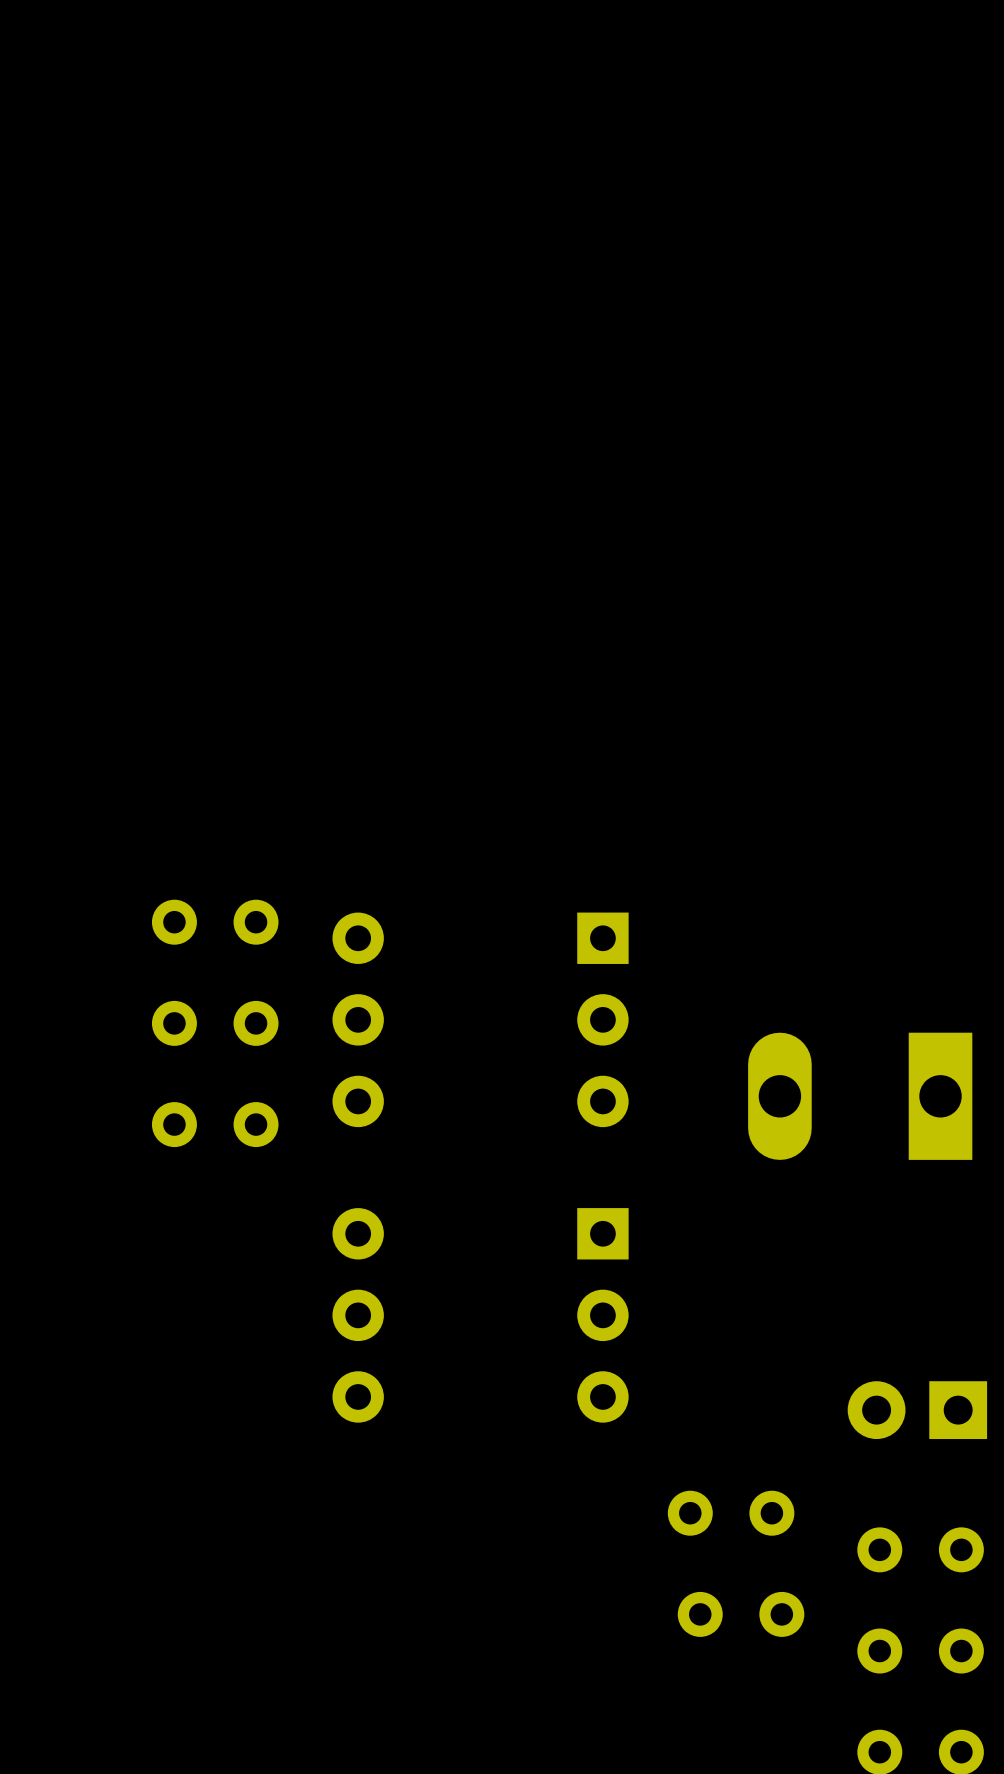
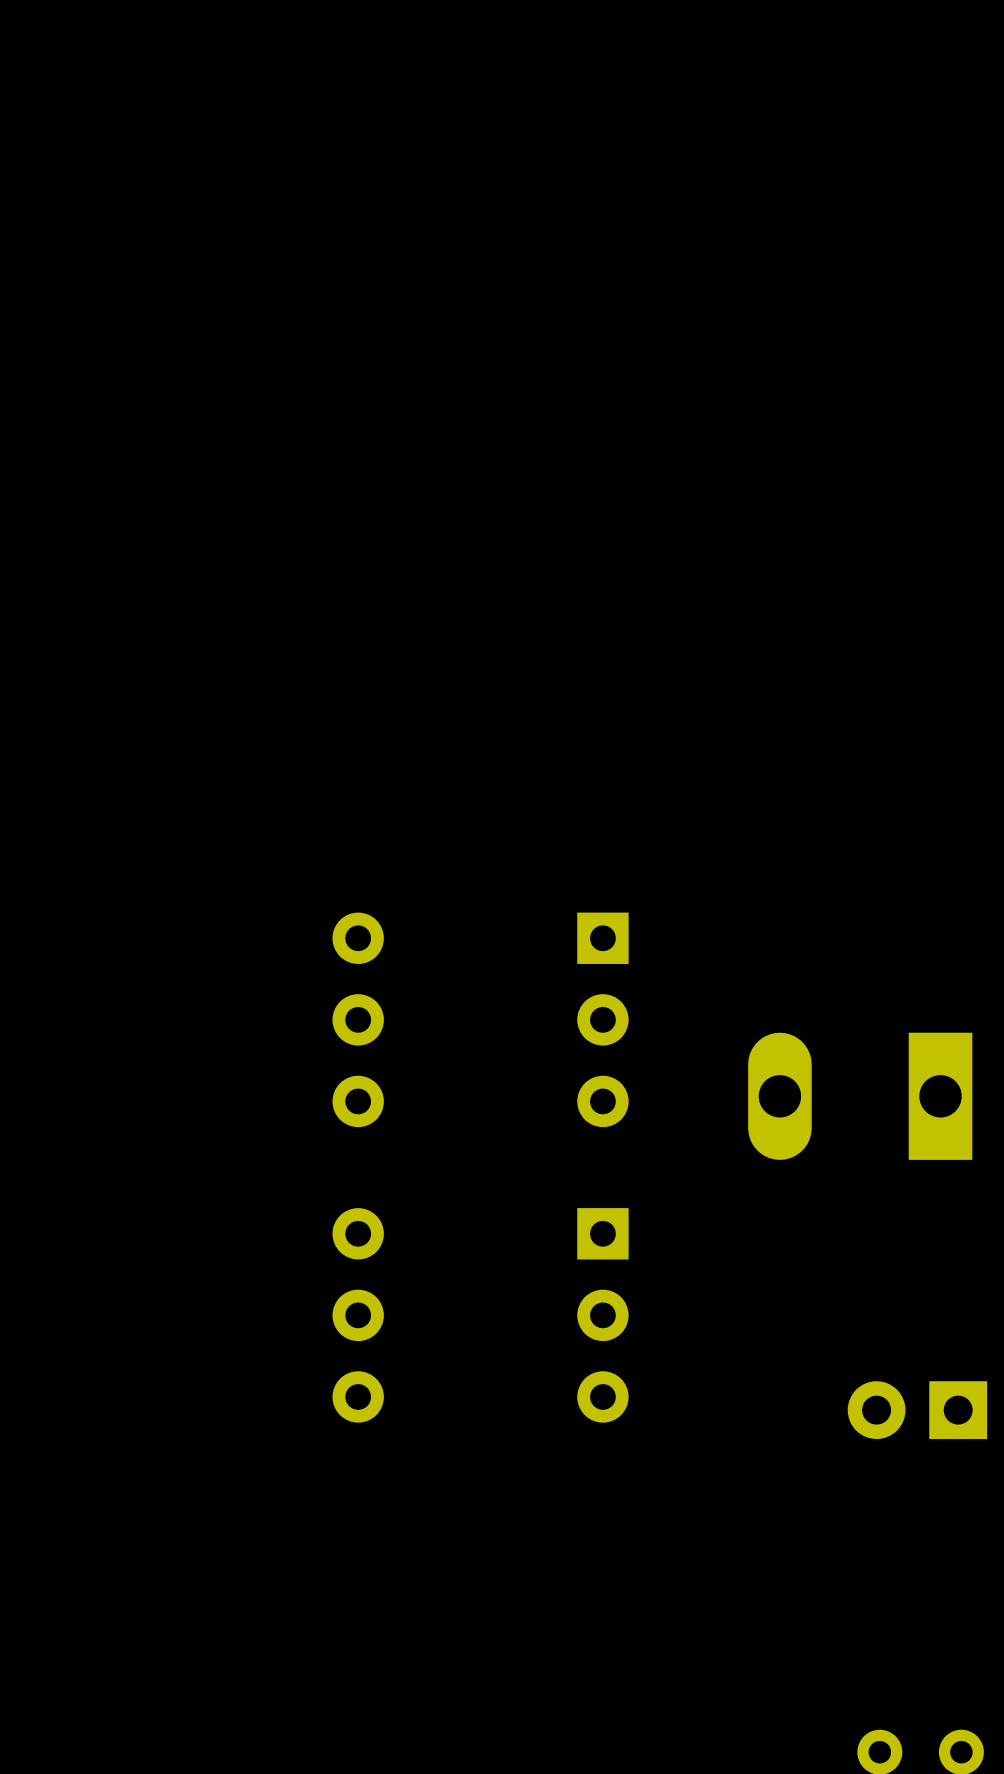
part: (215, 922) -> none
part: (215, 1023) -> none
part: (215, 1124) -> none
part: (731, 1513) -> none
part: (920, 1549) -> none
part: (741, 1614) -> none
part: (920, 1651) -> none

